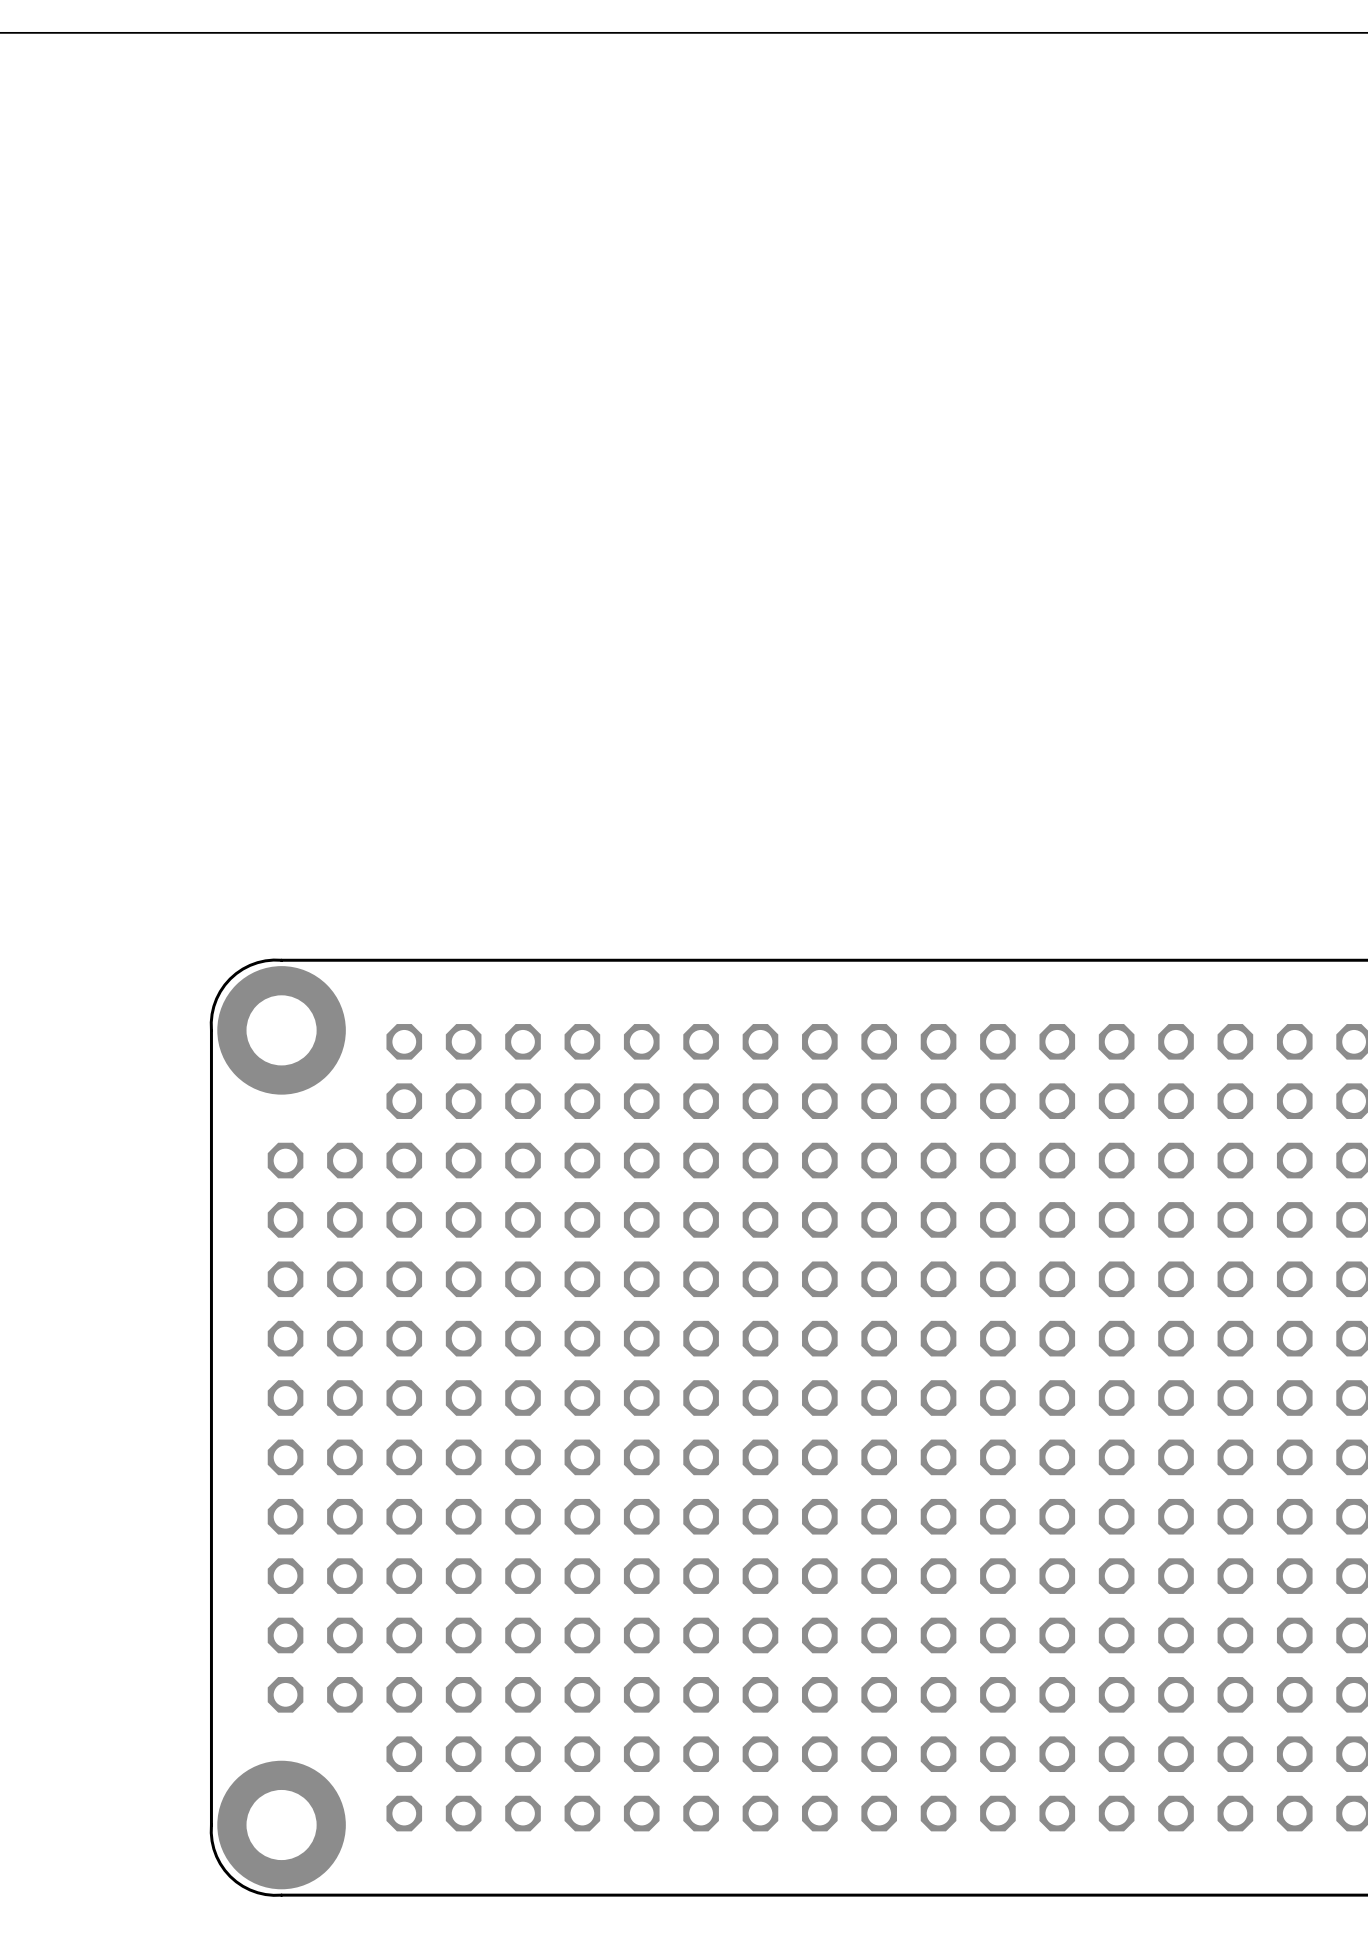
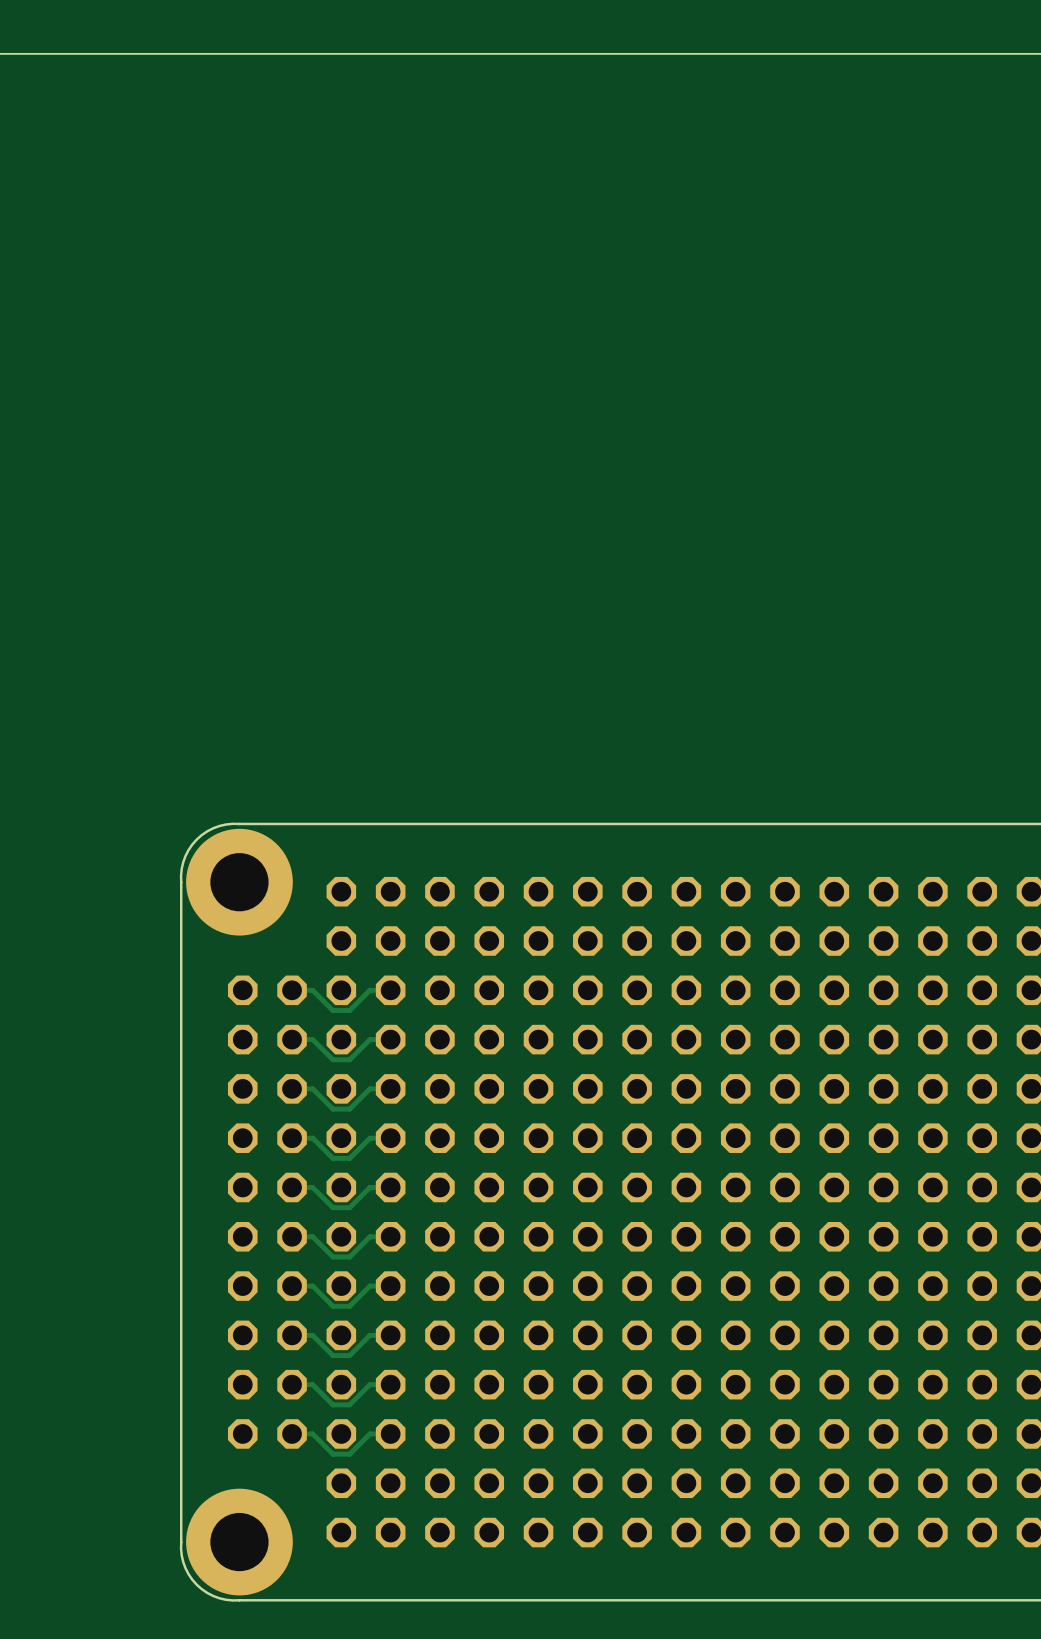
track: none -> (390, 990) (369, 990) (349, 1010) (332, 1010) (312, 990) (292, 990)
track: none -> (390, 1039) (369, 1039) (349, 1059) (332, 1059) (312, 1039) (292, 1039)
track: none -> (390, 1088) (369, 1088) (349, 1109) (332, 1109) (312, 1088) (292, 1088)
track: none -> (390, 1138) (369, 1138) (349, 1158) (332, 1158) (312, 1138) (292, 1138)
track: none -> (390, 1187) (369, 1187) (349, 1207) (332, 1207) (312, 1187) (292, 1187)
track: none -> (390, 1236) (369, 1236) (349, 1256) (332, 1256) (312, 1236) (292, 1236)
track: none -> (390, 1286) (369, 1286) (349, 1306) (332, 1306) (312, 1286) (292, 1286)
track: none -> (390, 1335) (369, 1335) (349, 1355) (332, 1355) (312, 1335) (292, 1335)
track: none -> (390, 1384) (369, 1384) (349, 1404) (332, 1404) (312, 1384) (292, 1384)
track: none -> (390, 1433) (369, 1433) (349, 1454) (332, 1454) (312, 1433) (292, 1433)

